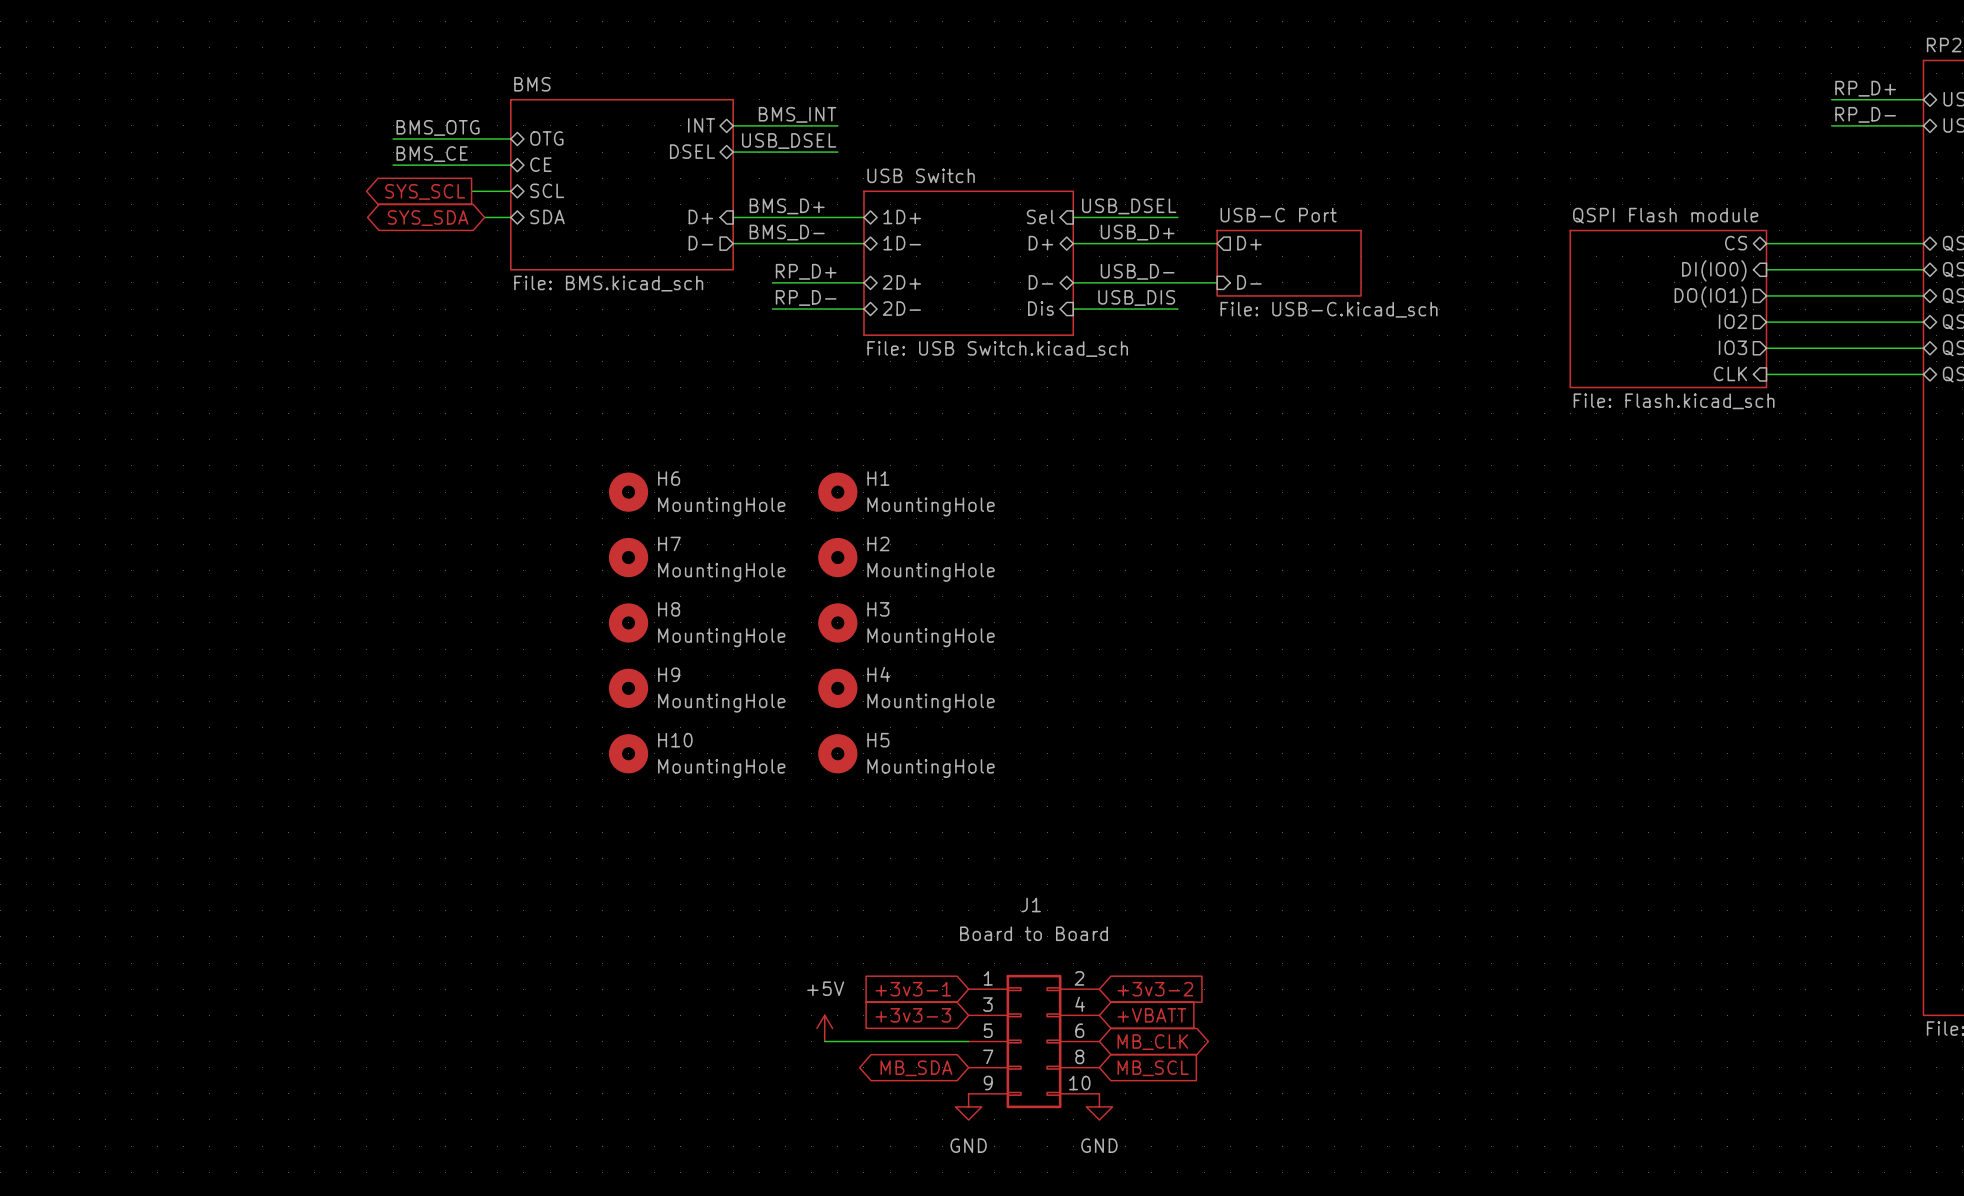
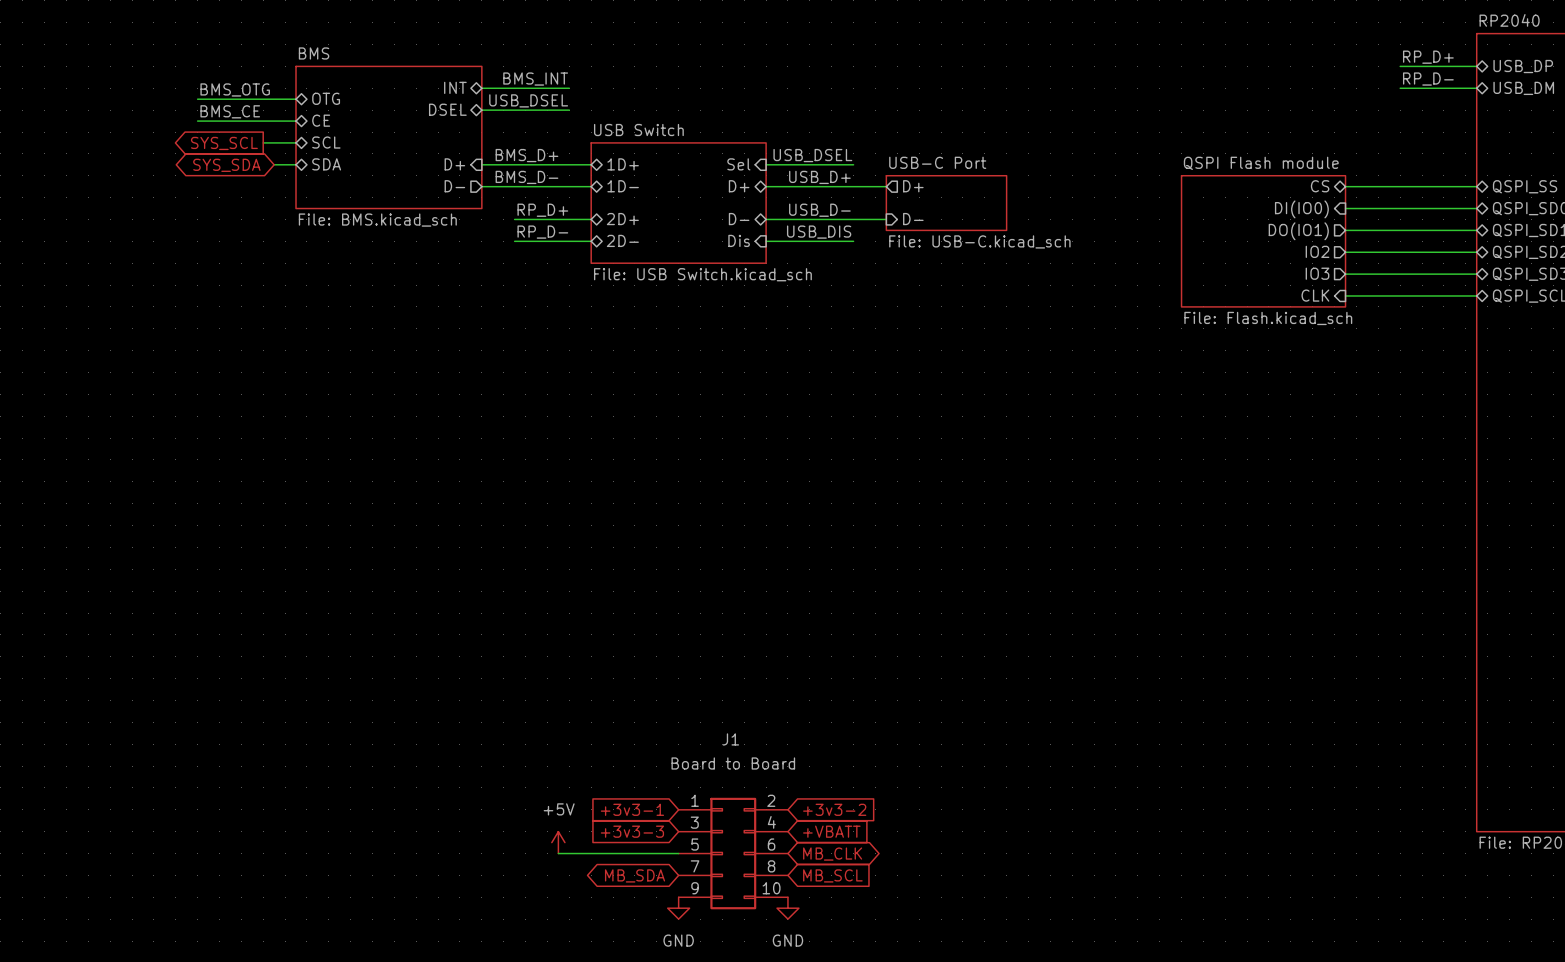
H6: MountingHole (628, 492) -> none
H1: MountingHole (837, 492) -> none
H7: MountingHole (628, 557) -> none
H2: MountingHole (837, 557) -> none
H8: MountingHole (628, 622) -> none
H3: MountingHole (837, 622) -> none
H9: MountingHole (628, 688) -> none
H4: MountingHole (837, 688) -> none
H10: MountingHole (628, 753) -> none
H5: MountingHole (837, 753) -> none

